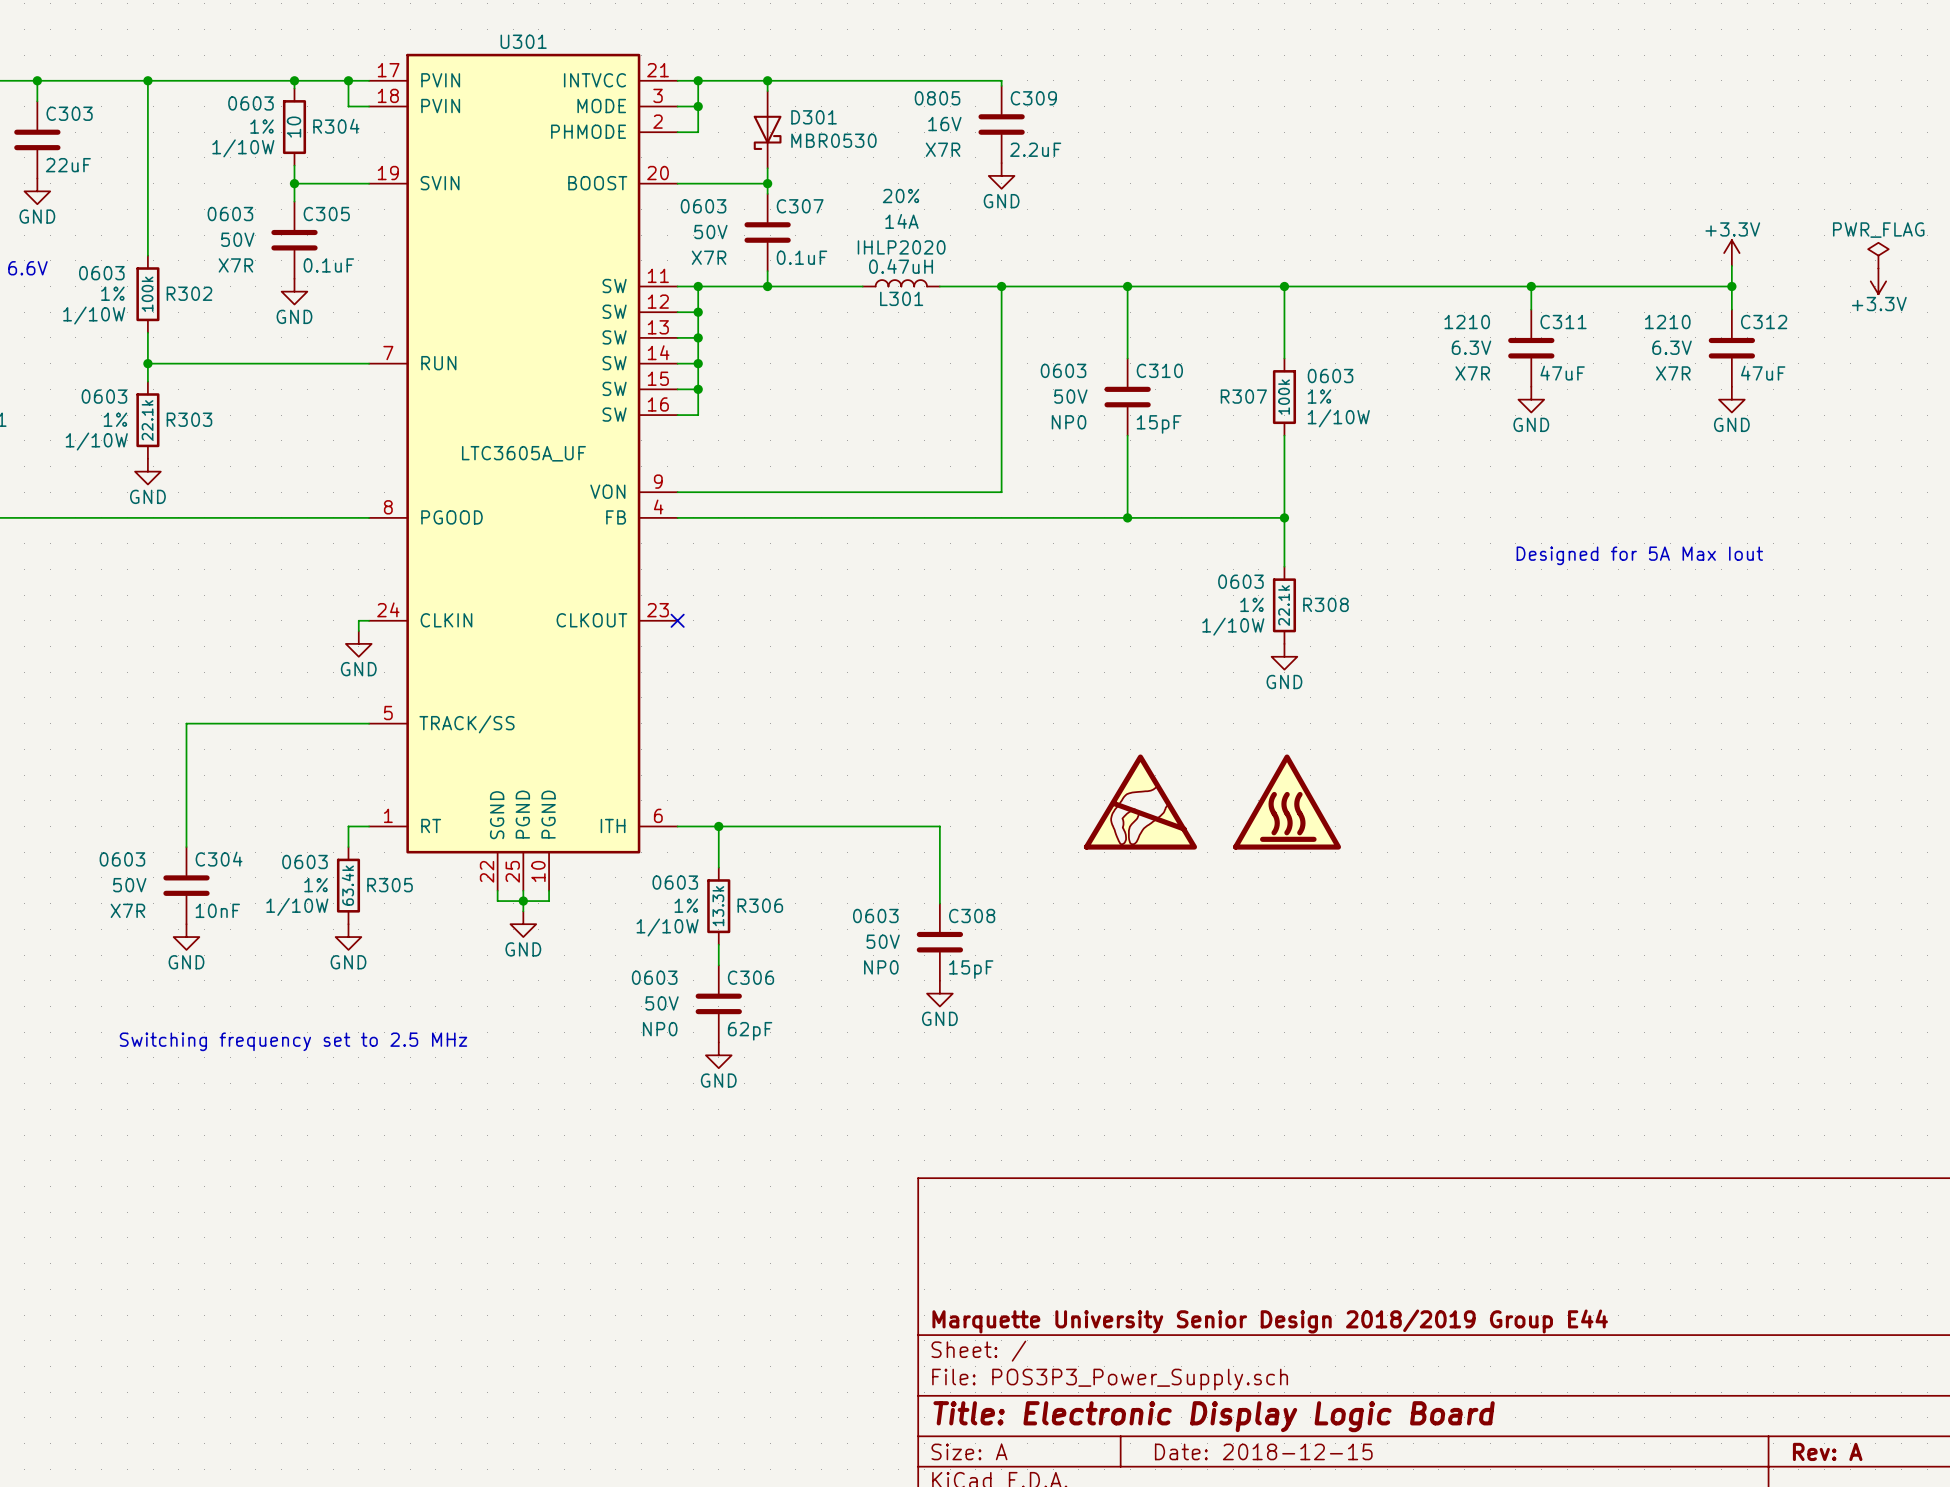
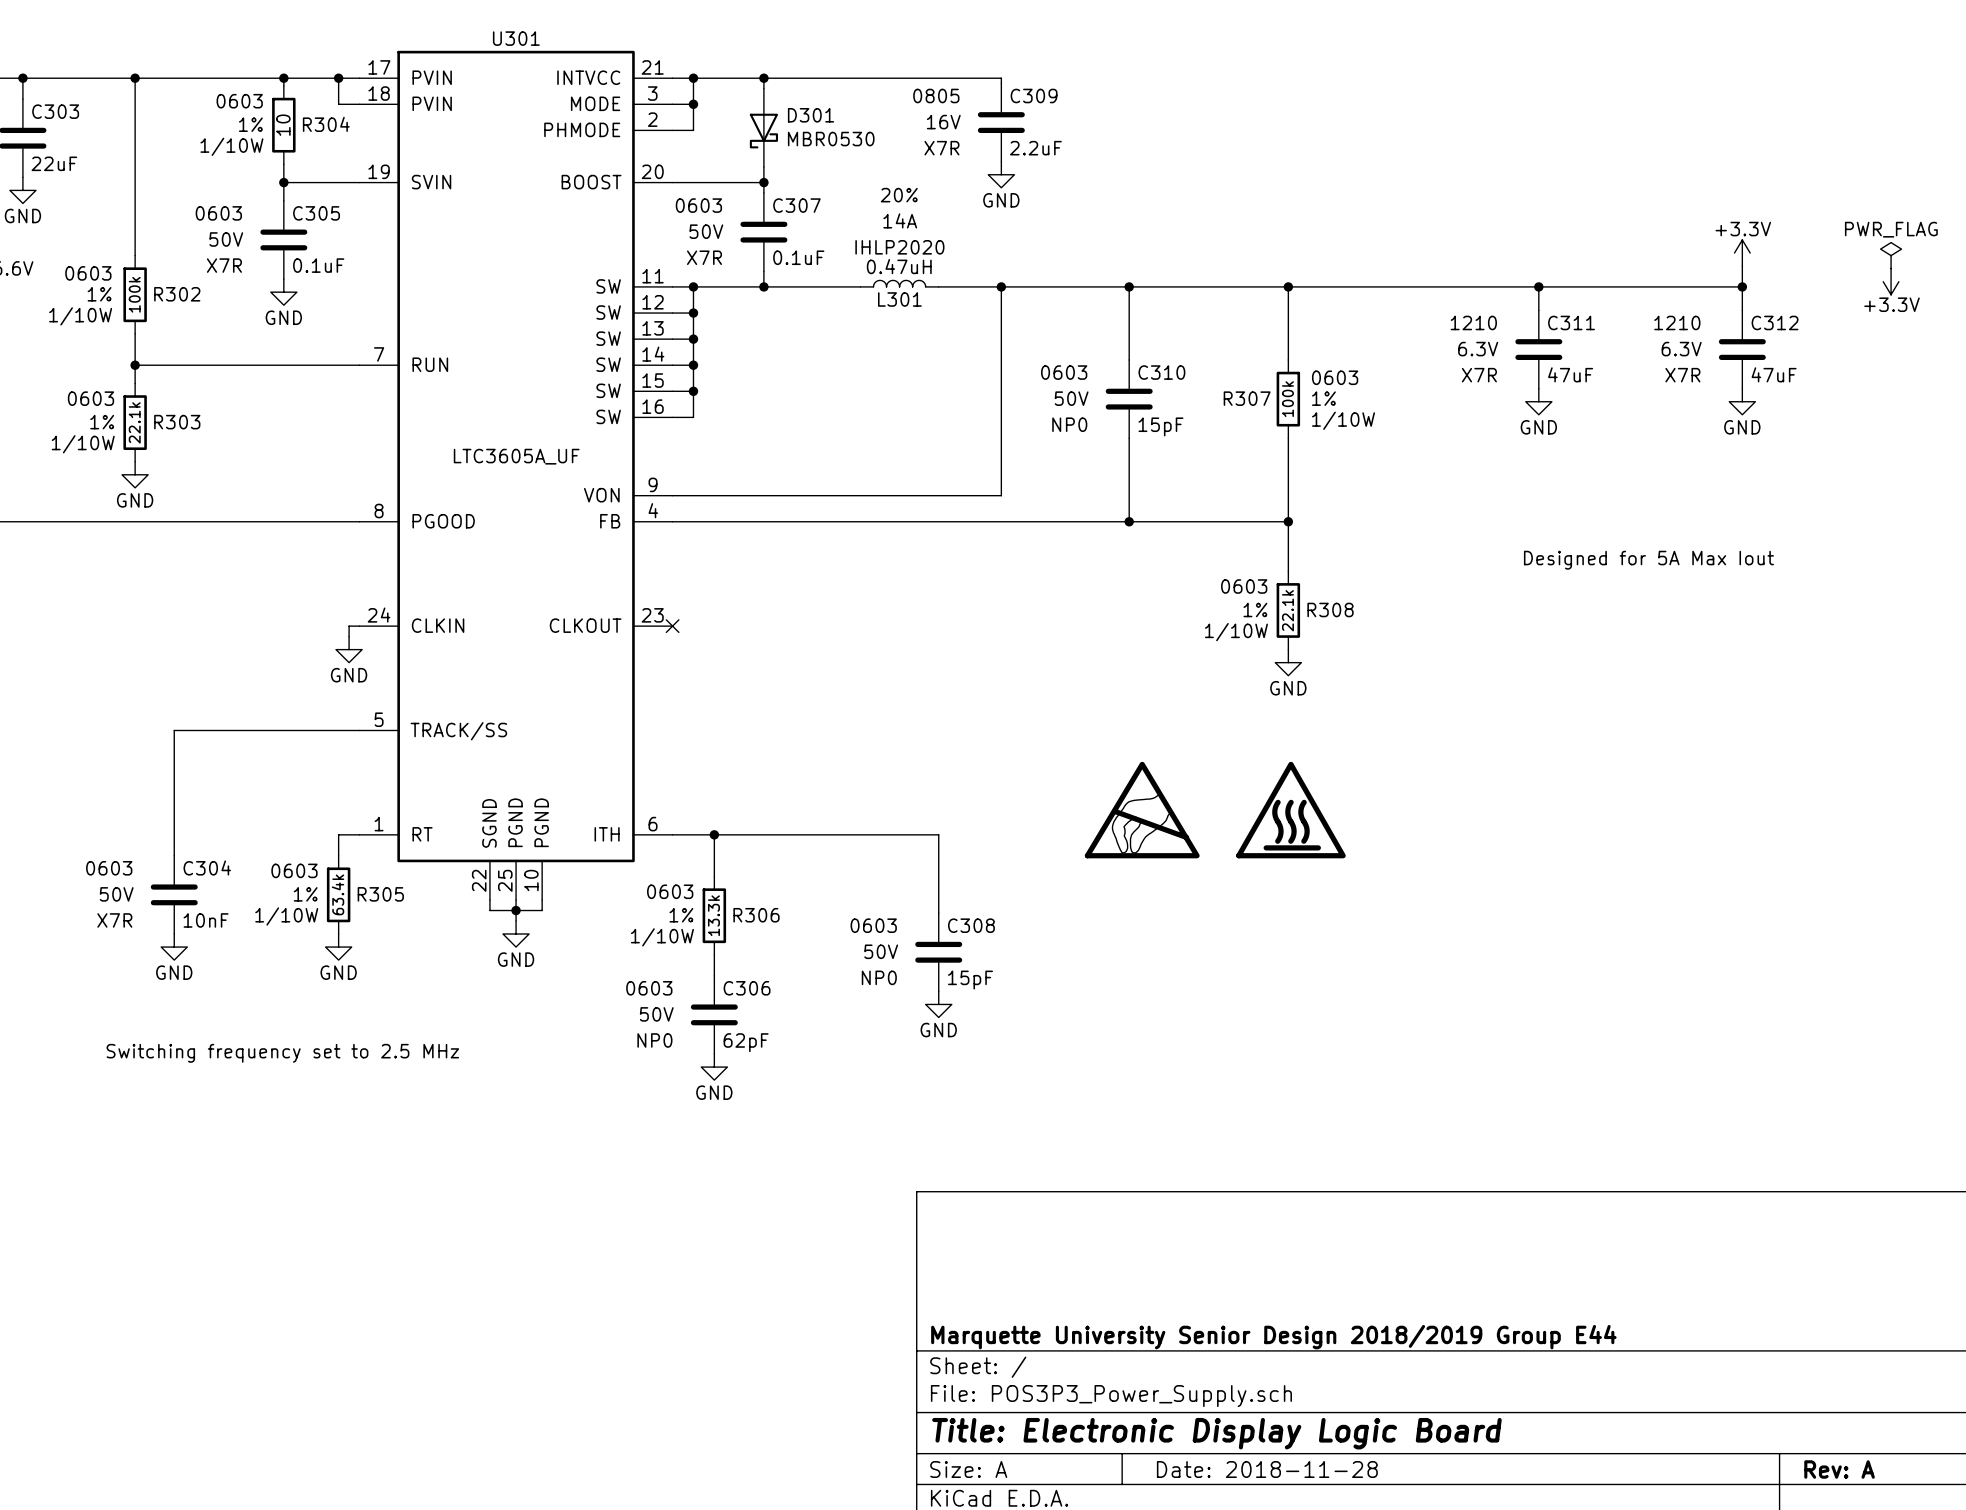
title block: Date: 2018-12-15 (1263, 1451) -> Date: 2018-11-28 (1267, 1469)

